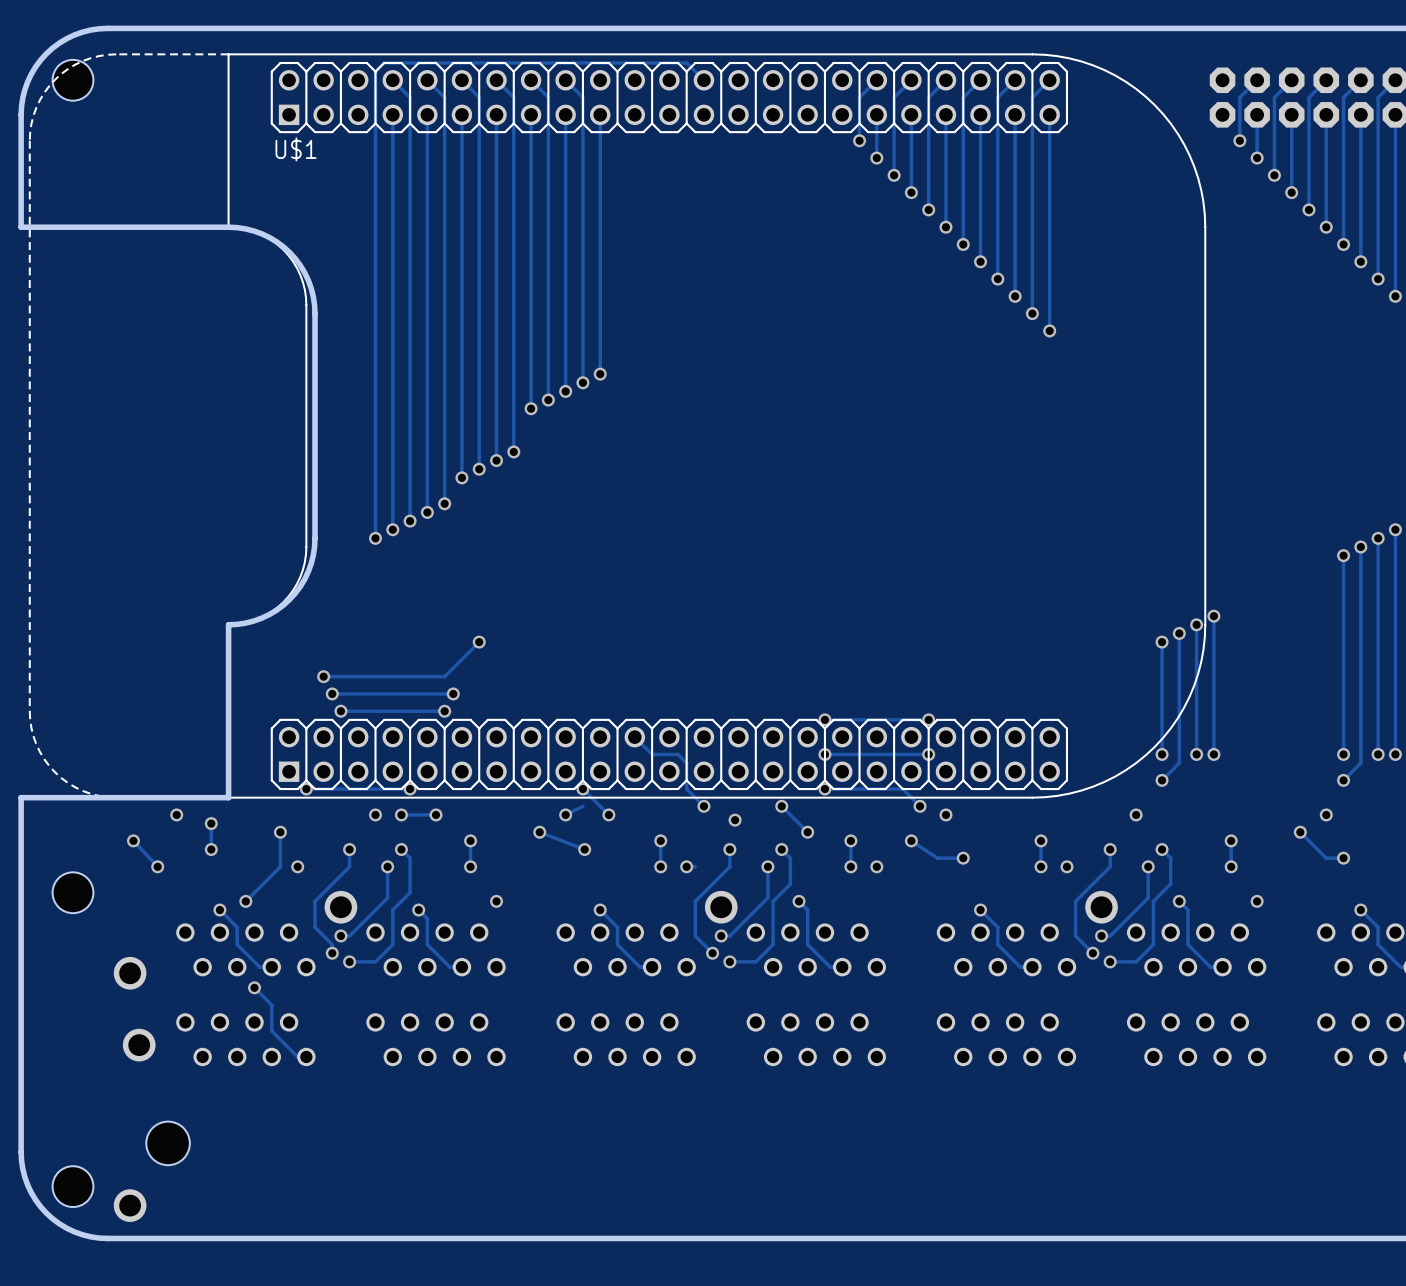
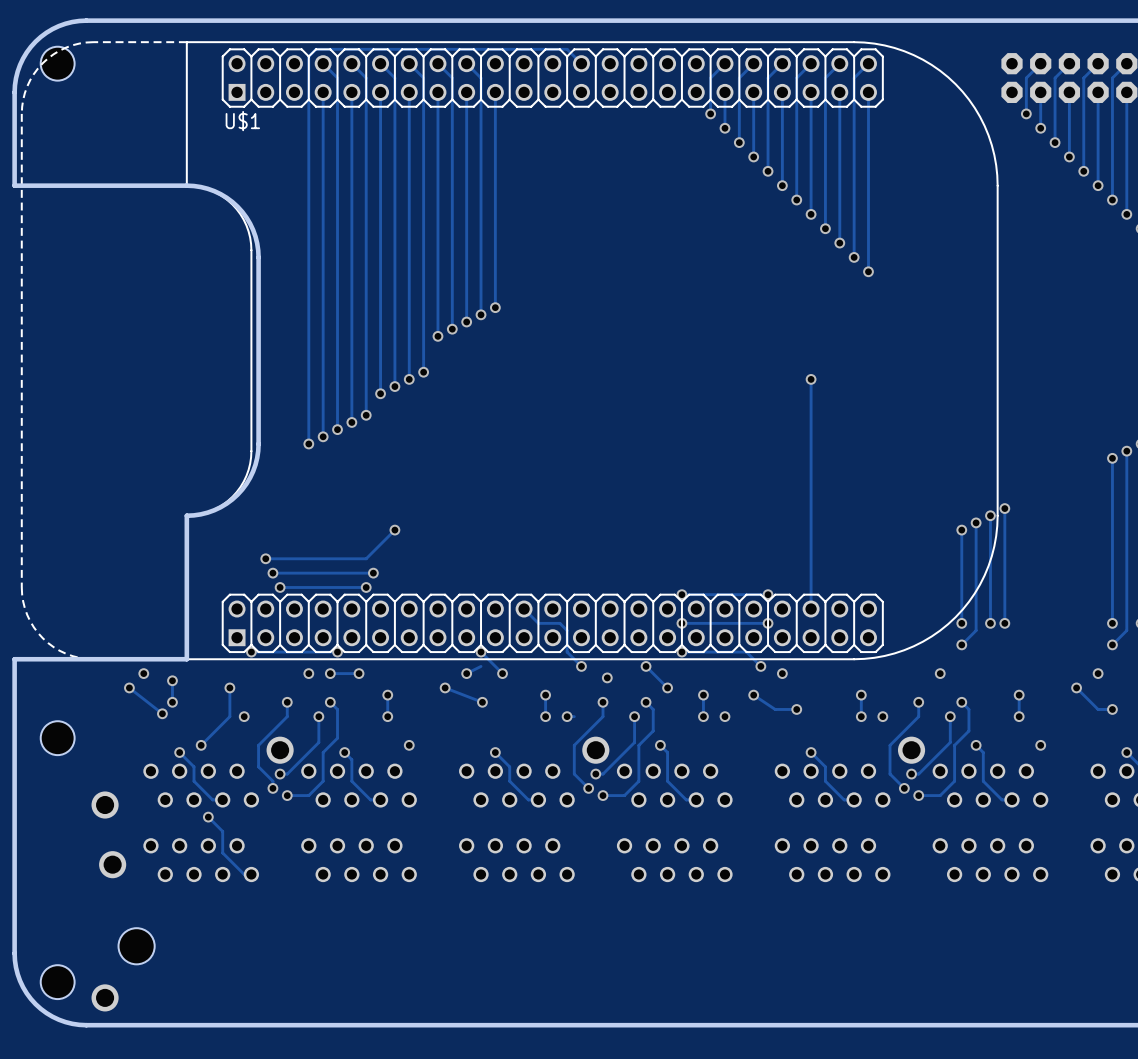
track: none -> (811, 379) (811, 609)
via: none -> (811, 379)
track: none -> (129, 687) (162, 713)
via: none -> (129, 687)
track: (133, 840) (157, 866) -> none
via: (133, 840) -> none
via: none -> (162, 713)
via: (157, 866) -> none

